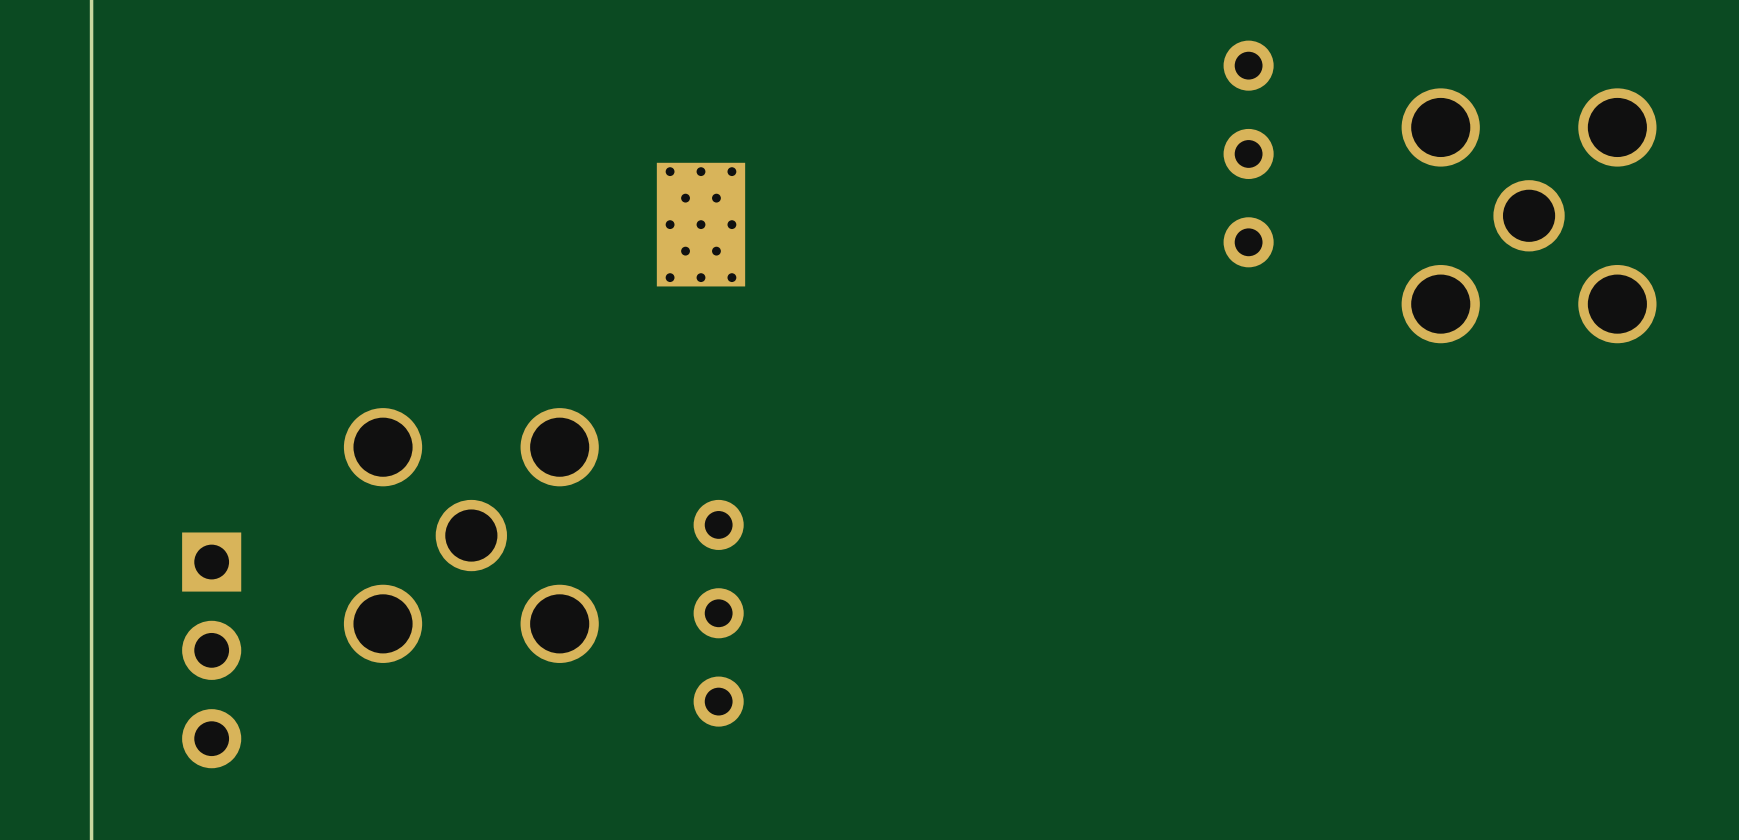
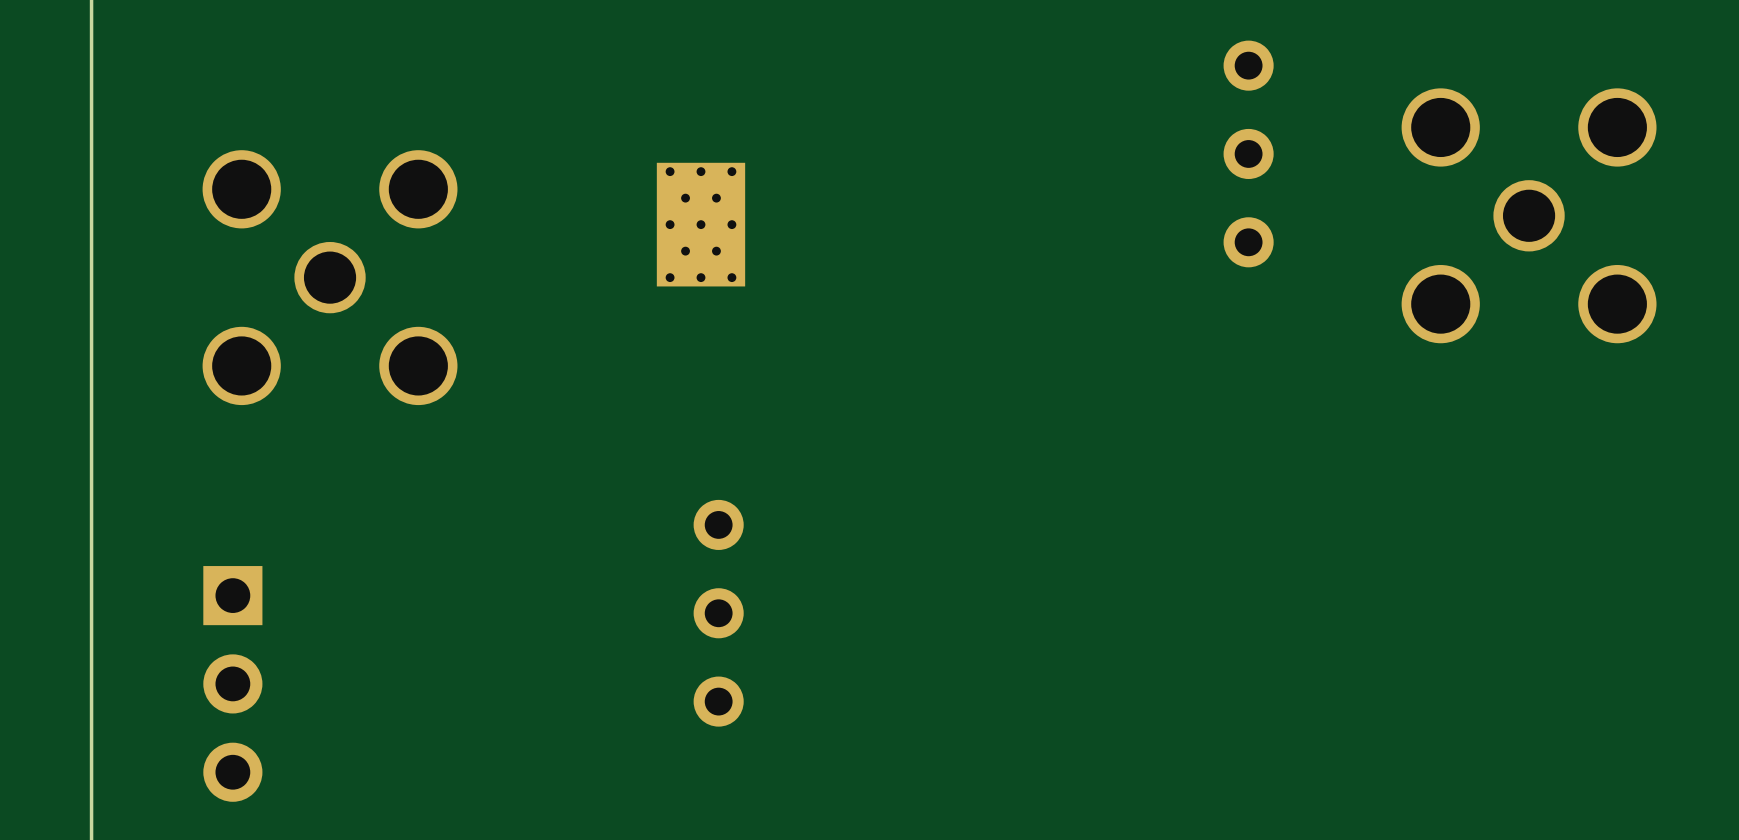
part position: (471, 535) -> (330, 277)
part position: (211, 650) -> (232, 683)

